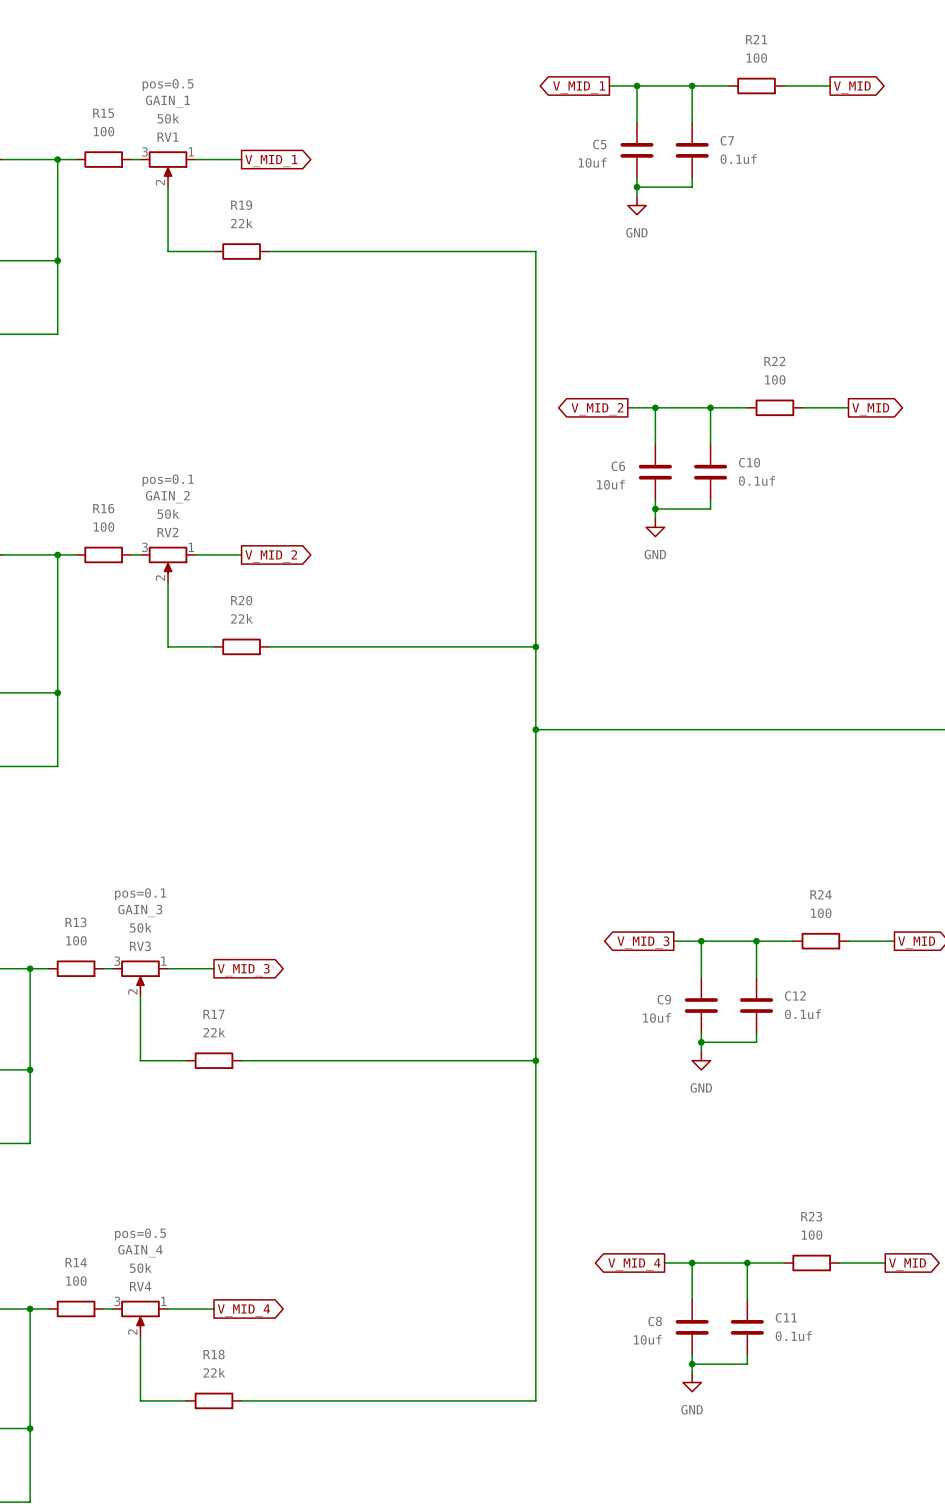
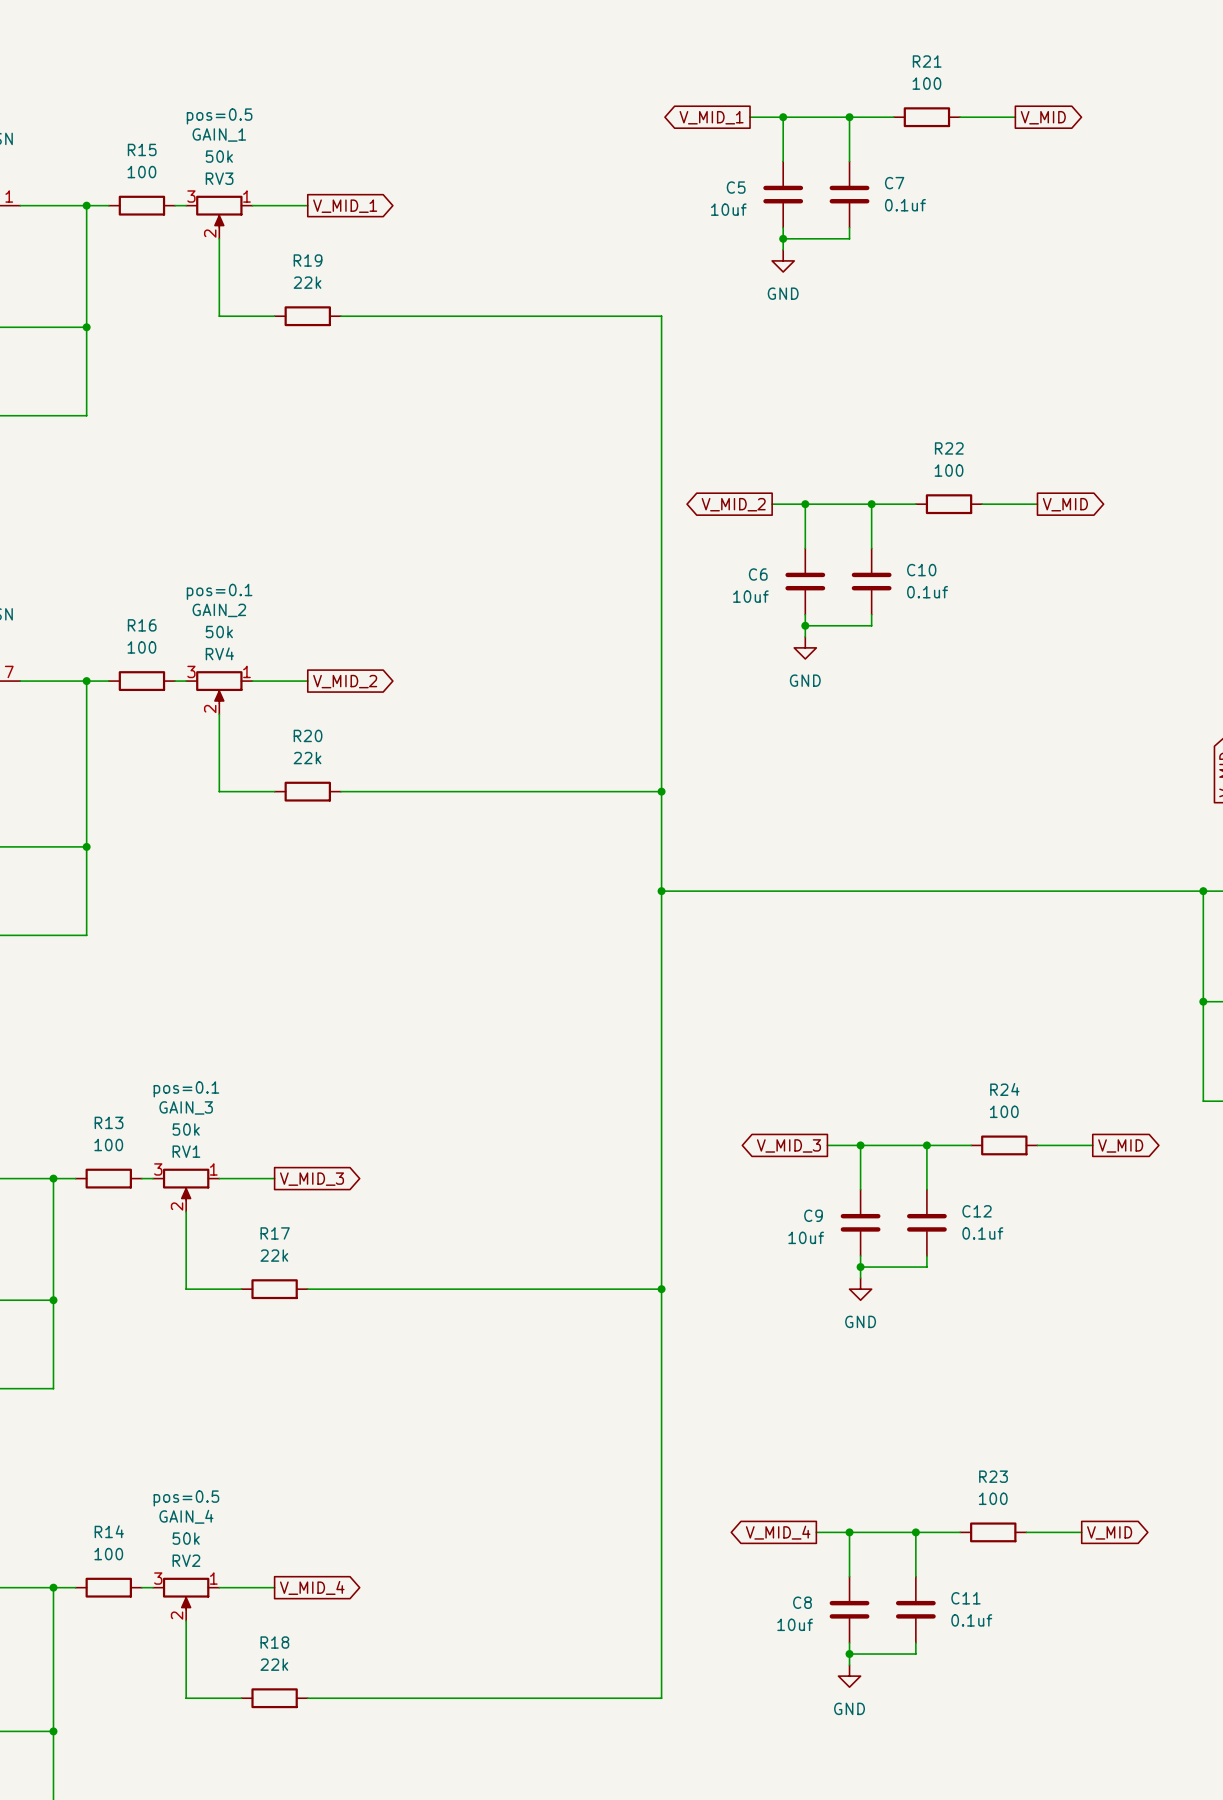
RV1 name: RV1 (168, 137) -> RV3 (219, 178)
RV2 name: RV2 (167, 532) -> RV4 (219, 653)
RV3 name: RV3 (140, 946) -> RV1 (186, 1151)
RV4 name: RV4 (140, 1286) -> RV2 (186, 1560)

